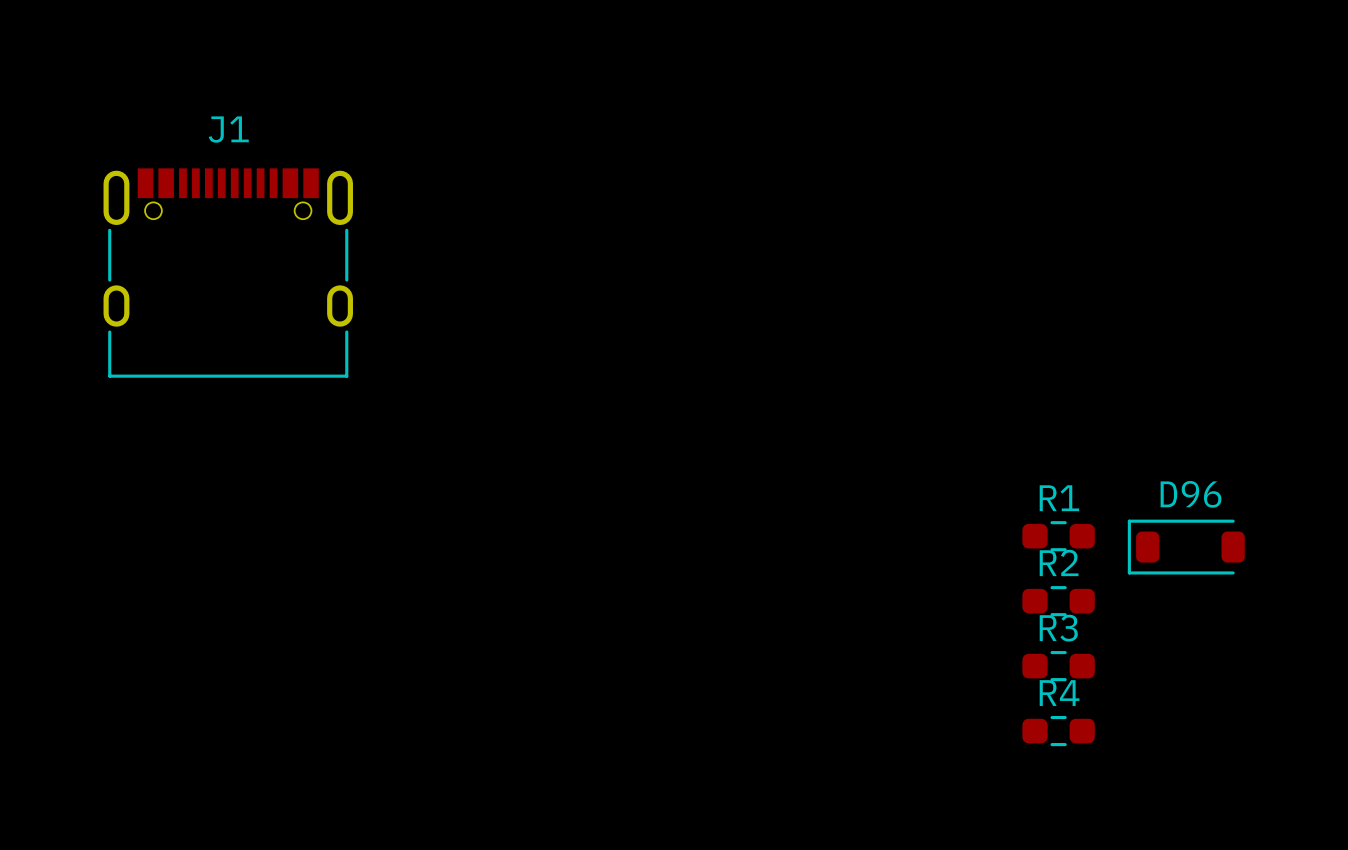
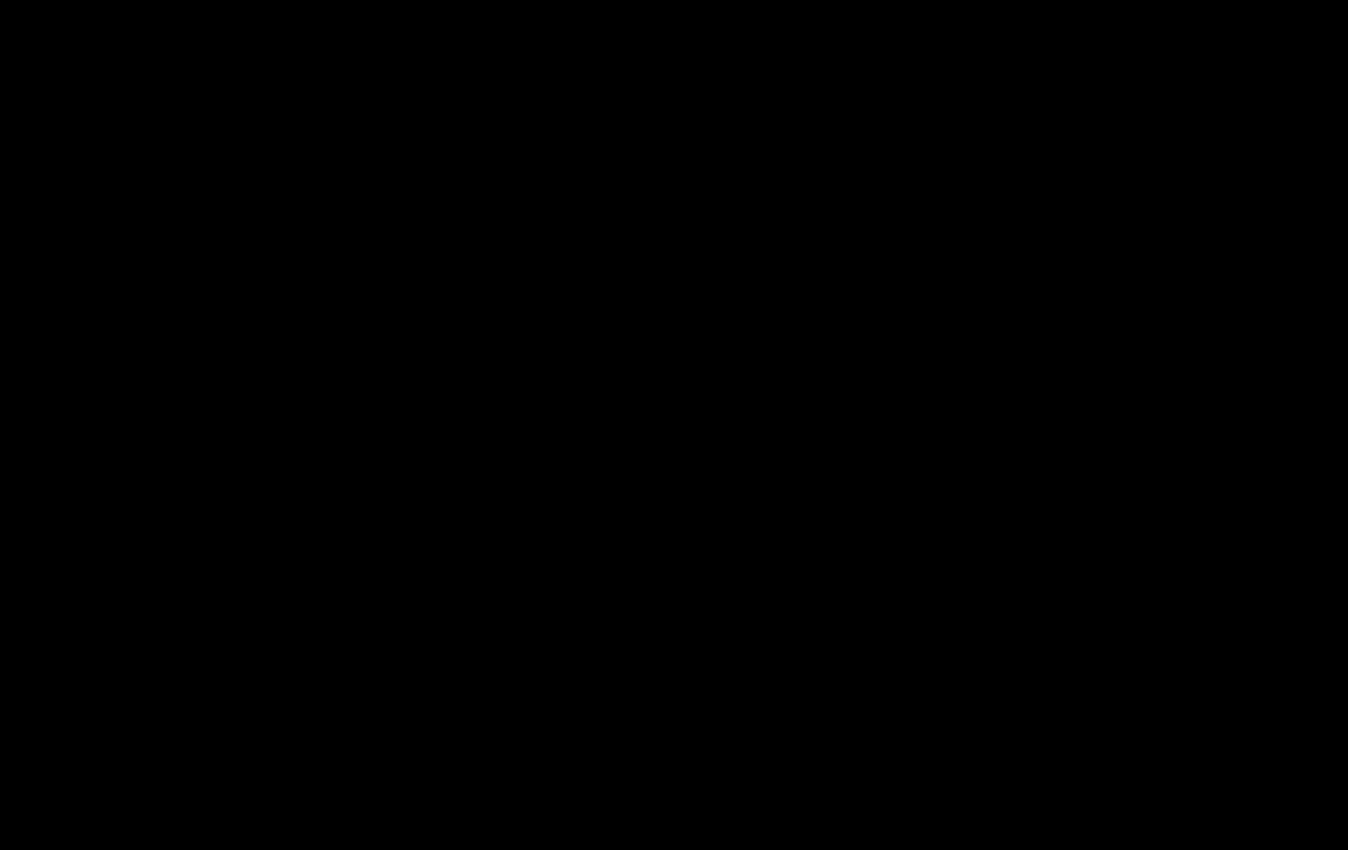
J1: (228, 273) -> none
R1: (1058, 536) -> none
D96: (1186, 547) -> none
R2: (1058, 601) -> none
R3: (1058, 666) -> none
R4: (1058, 731) -> none

